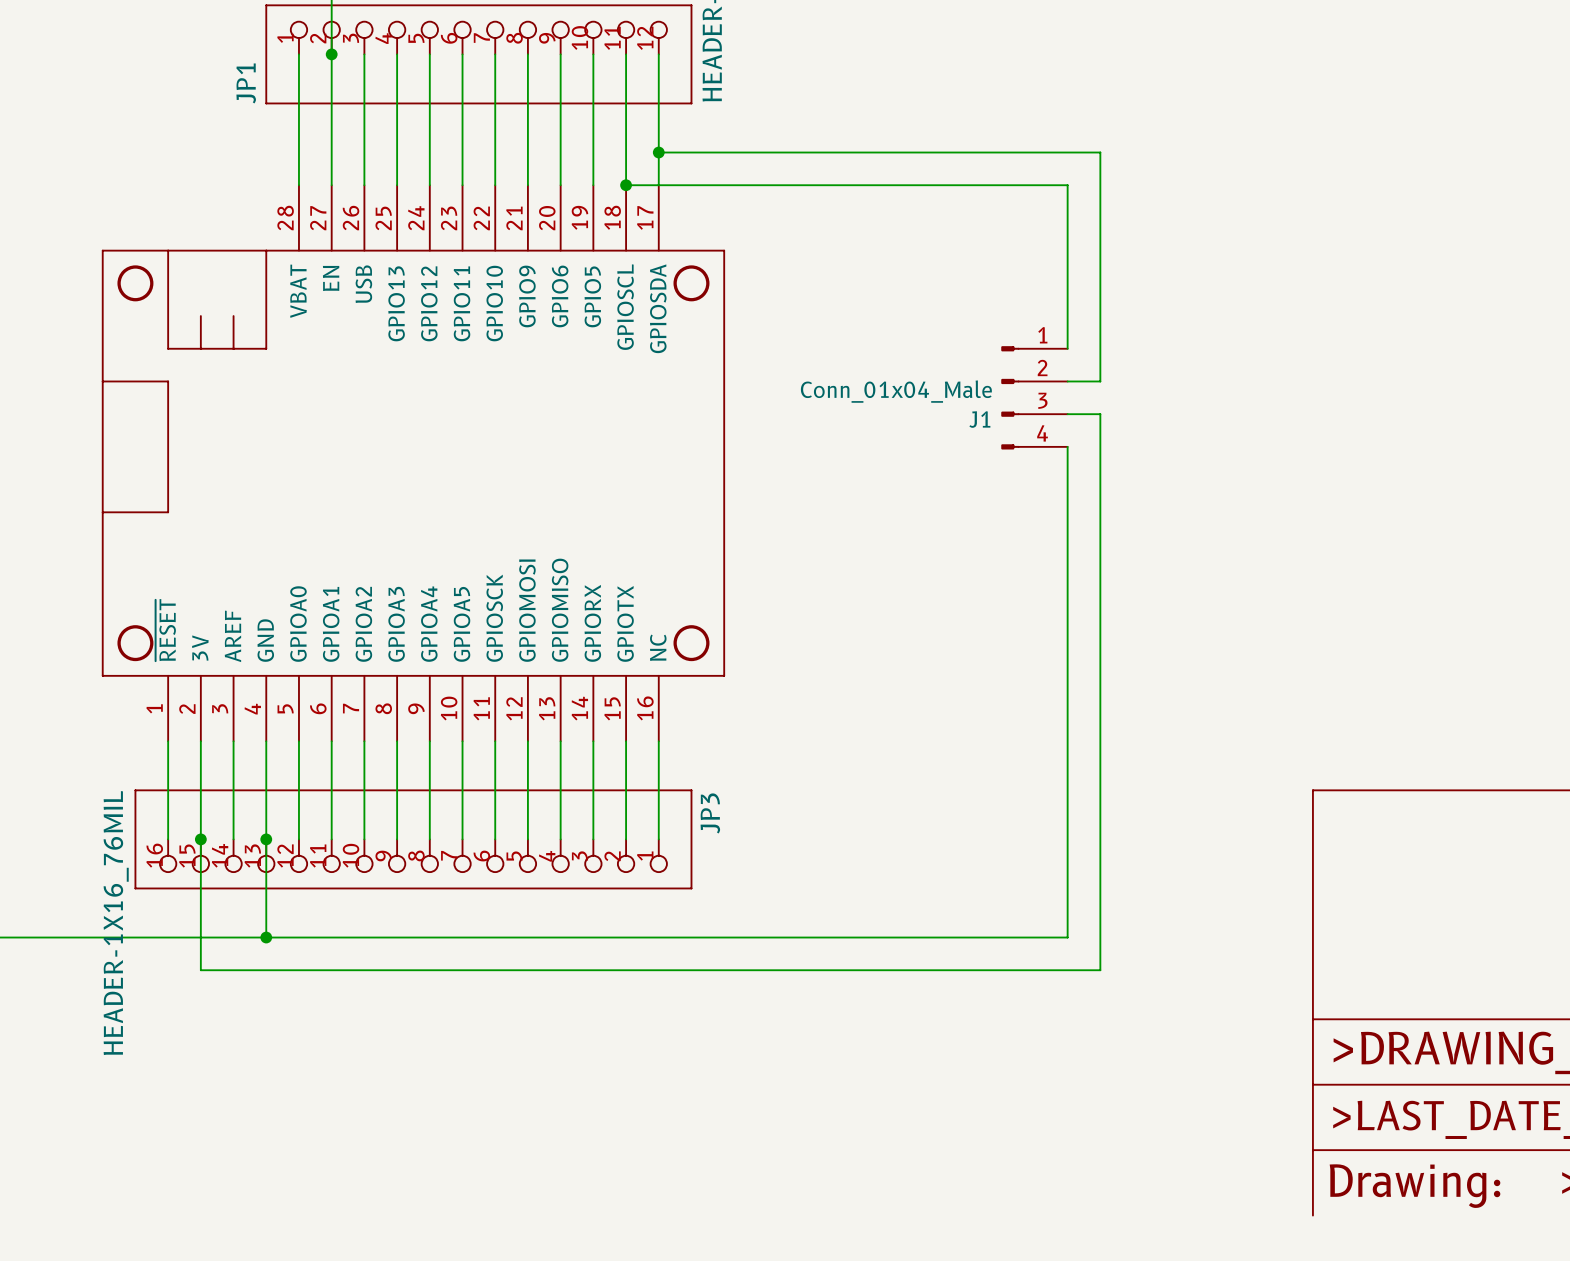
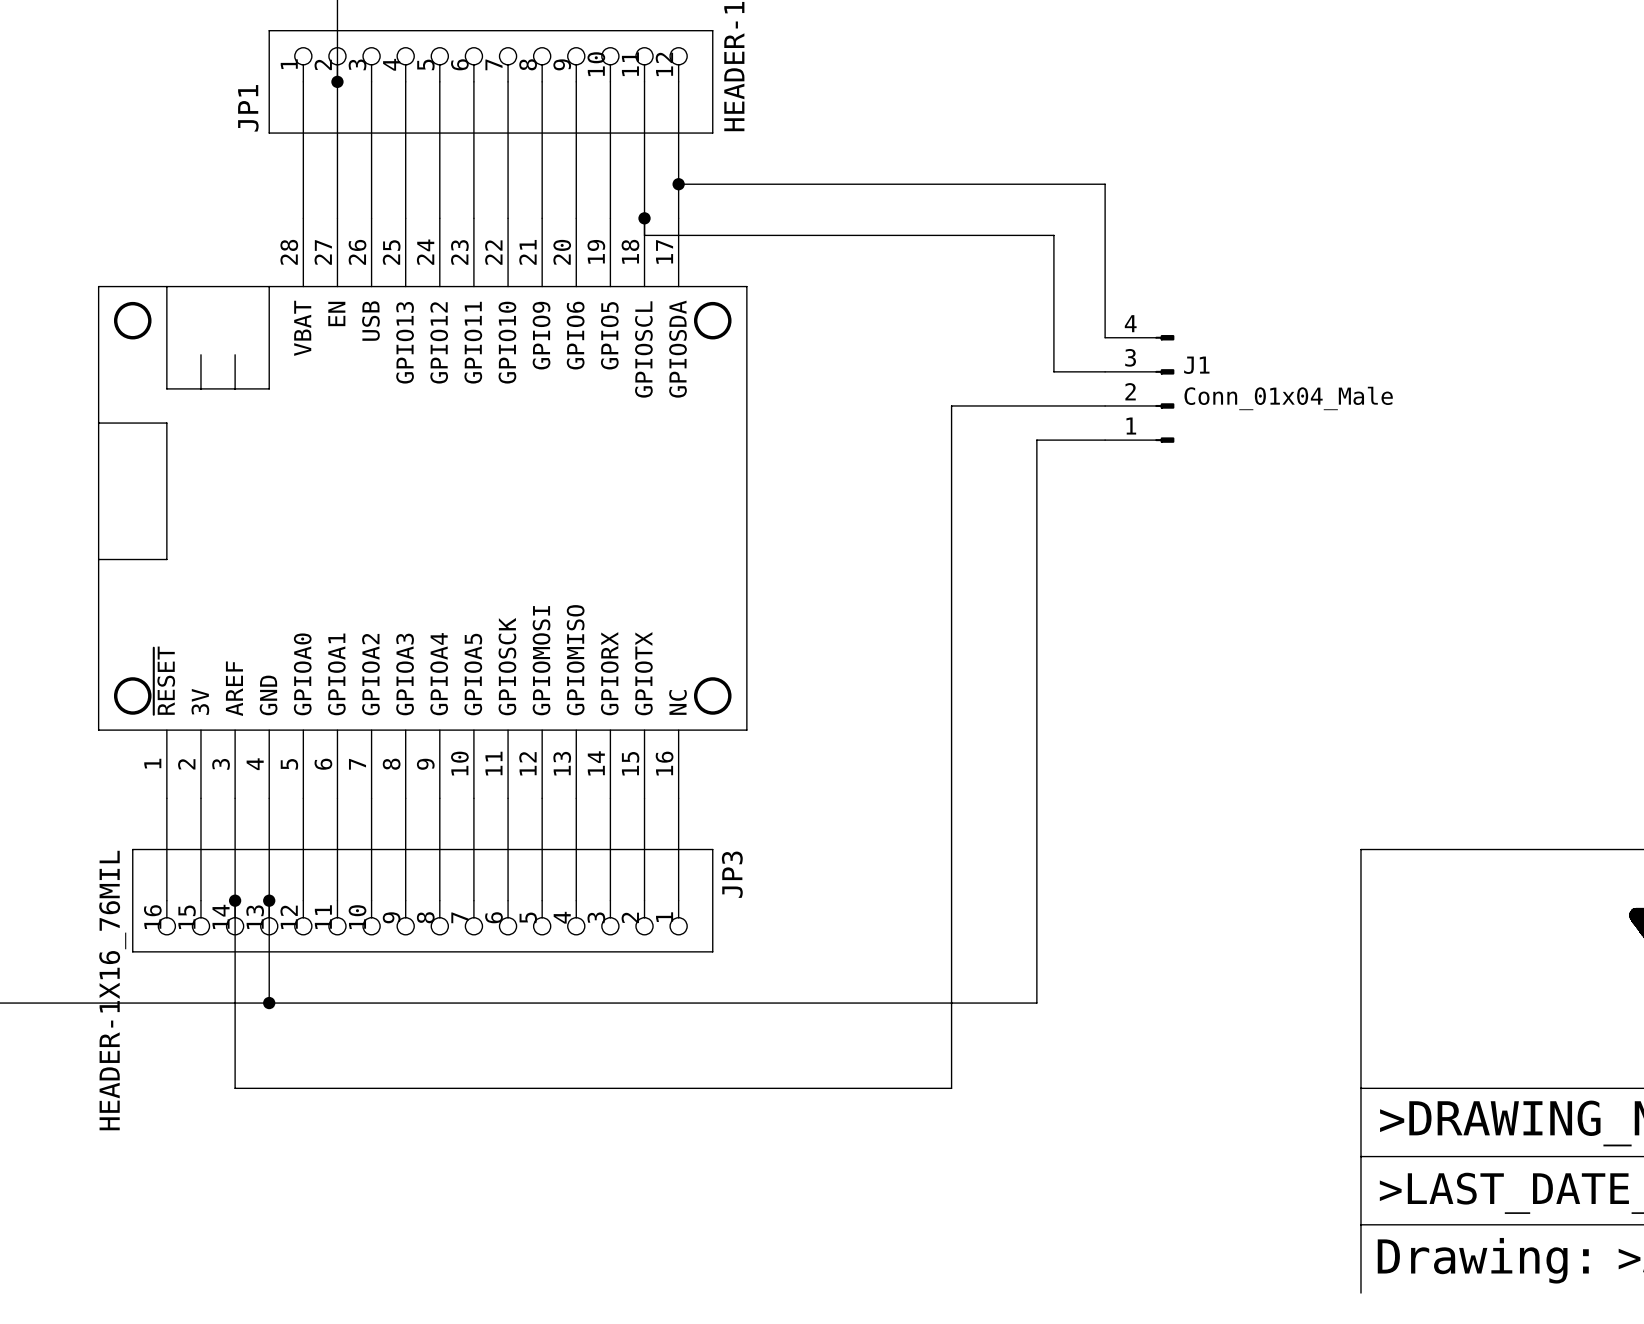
wire: (1067, 152) (1100, 152) (1100, 381) (1067, 381) -> (1105, 184) (1105, 218)
wire: (626, 185) (1067, 185) -> (644, 218) (644, 235) (1053, 235) (1053, 371) (1105, 371)
wire: (1067, 299) (1067, 348) -> none
wire: none -> (1105, 405) (951, 405) (951, 1088) (235, 1088) (235, 900)
J1 rotation: 0° (1010, 397) -> 180° (1164, 388)
J1 position: (1034, 397) -> (1139, 388)
wire: (1067, 414) (1100, 414) (1100, 970) (200, 970) (200, 839) -> none
wire: (1067, 446) (1067, 937) (1002, 937) -> (1105, 440) (1036, 440) (1036, 1003)
junction position: (200, 839) -> (235, 900)

